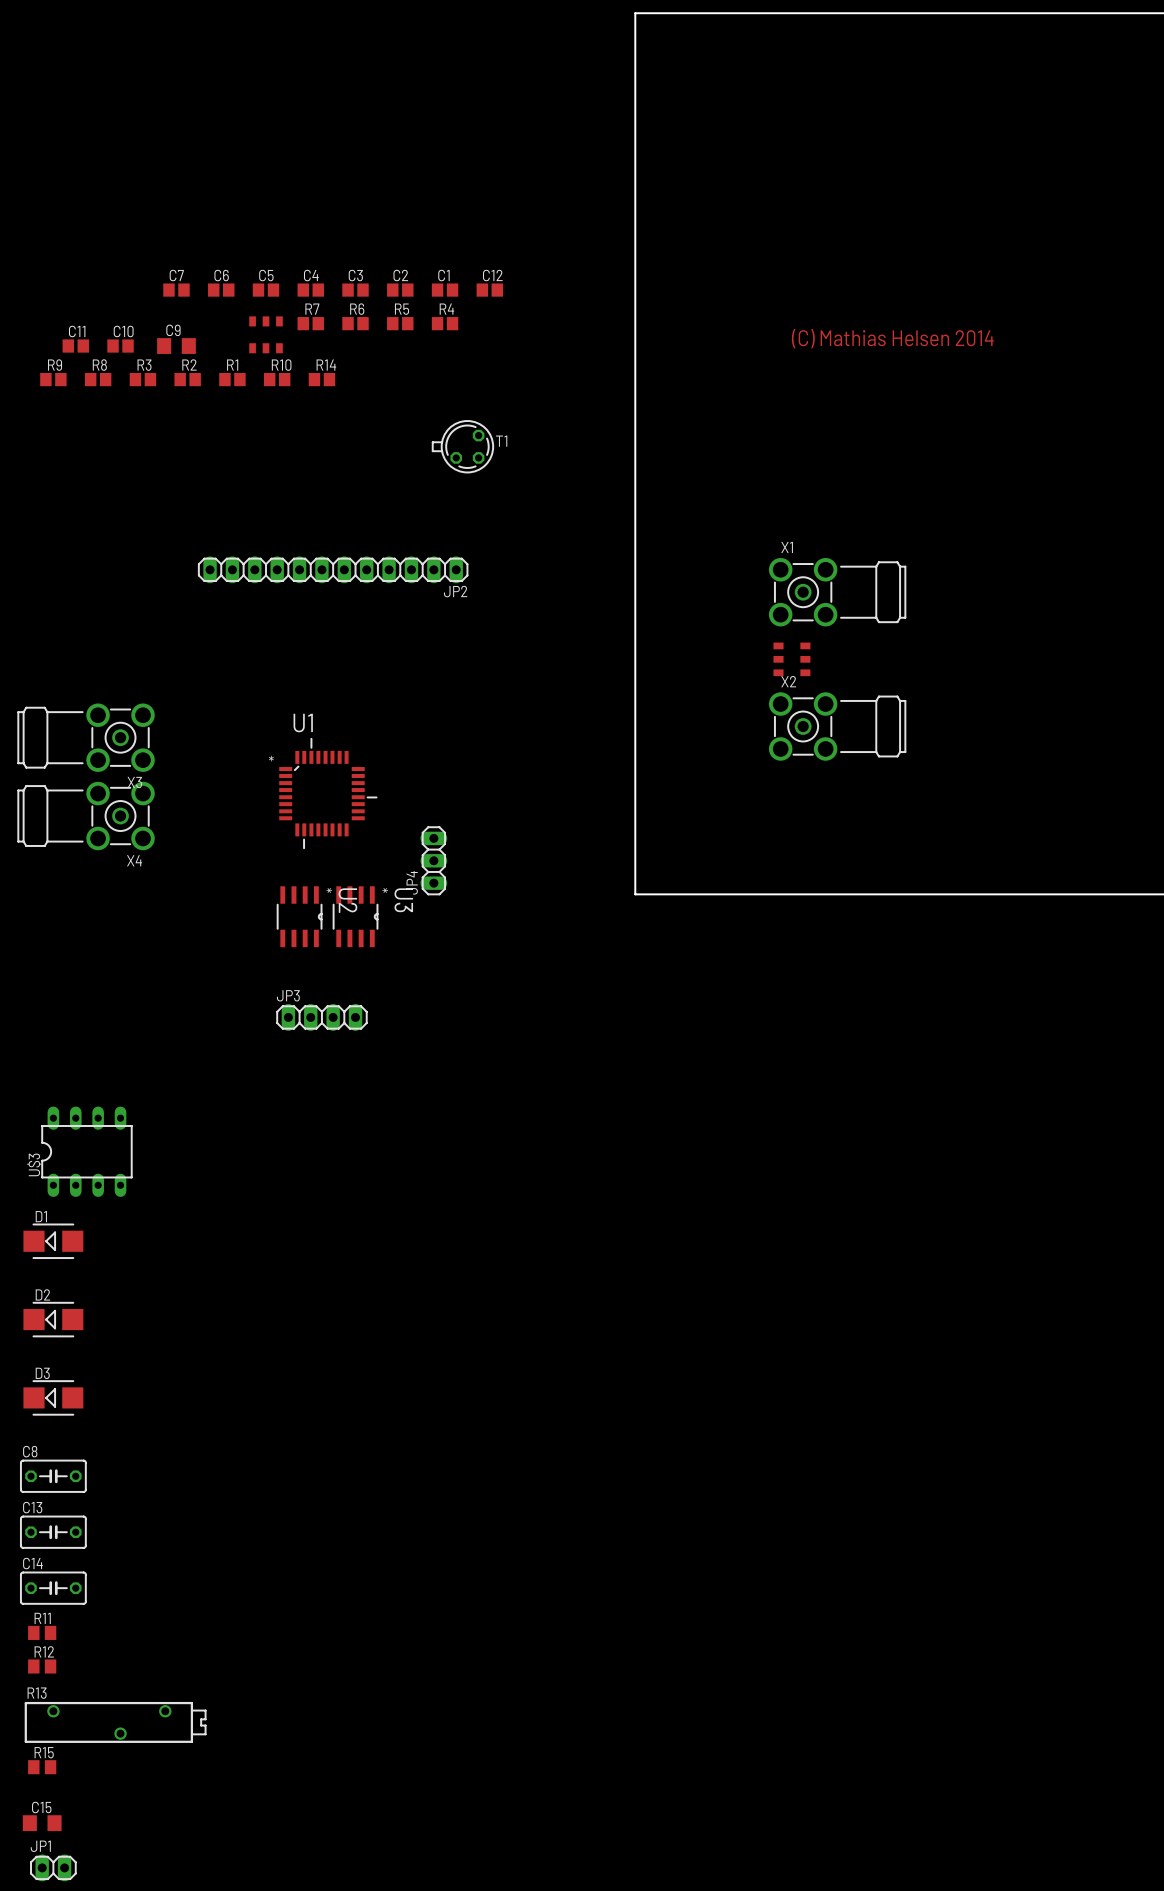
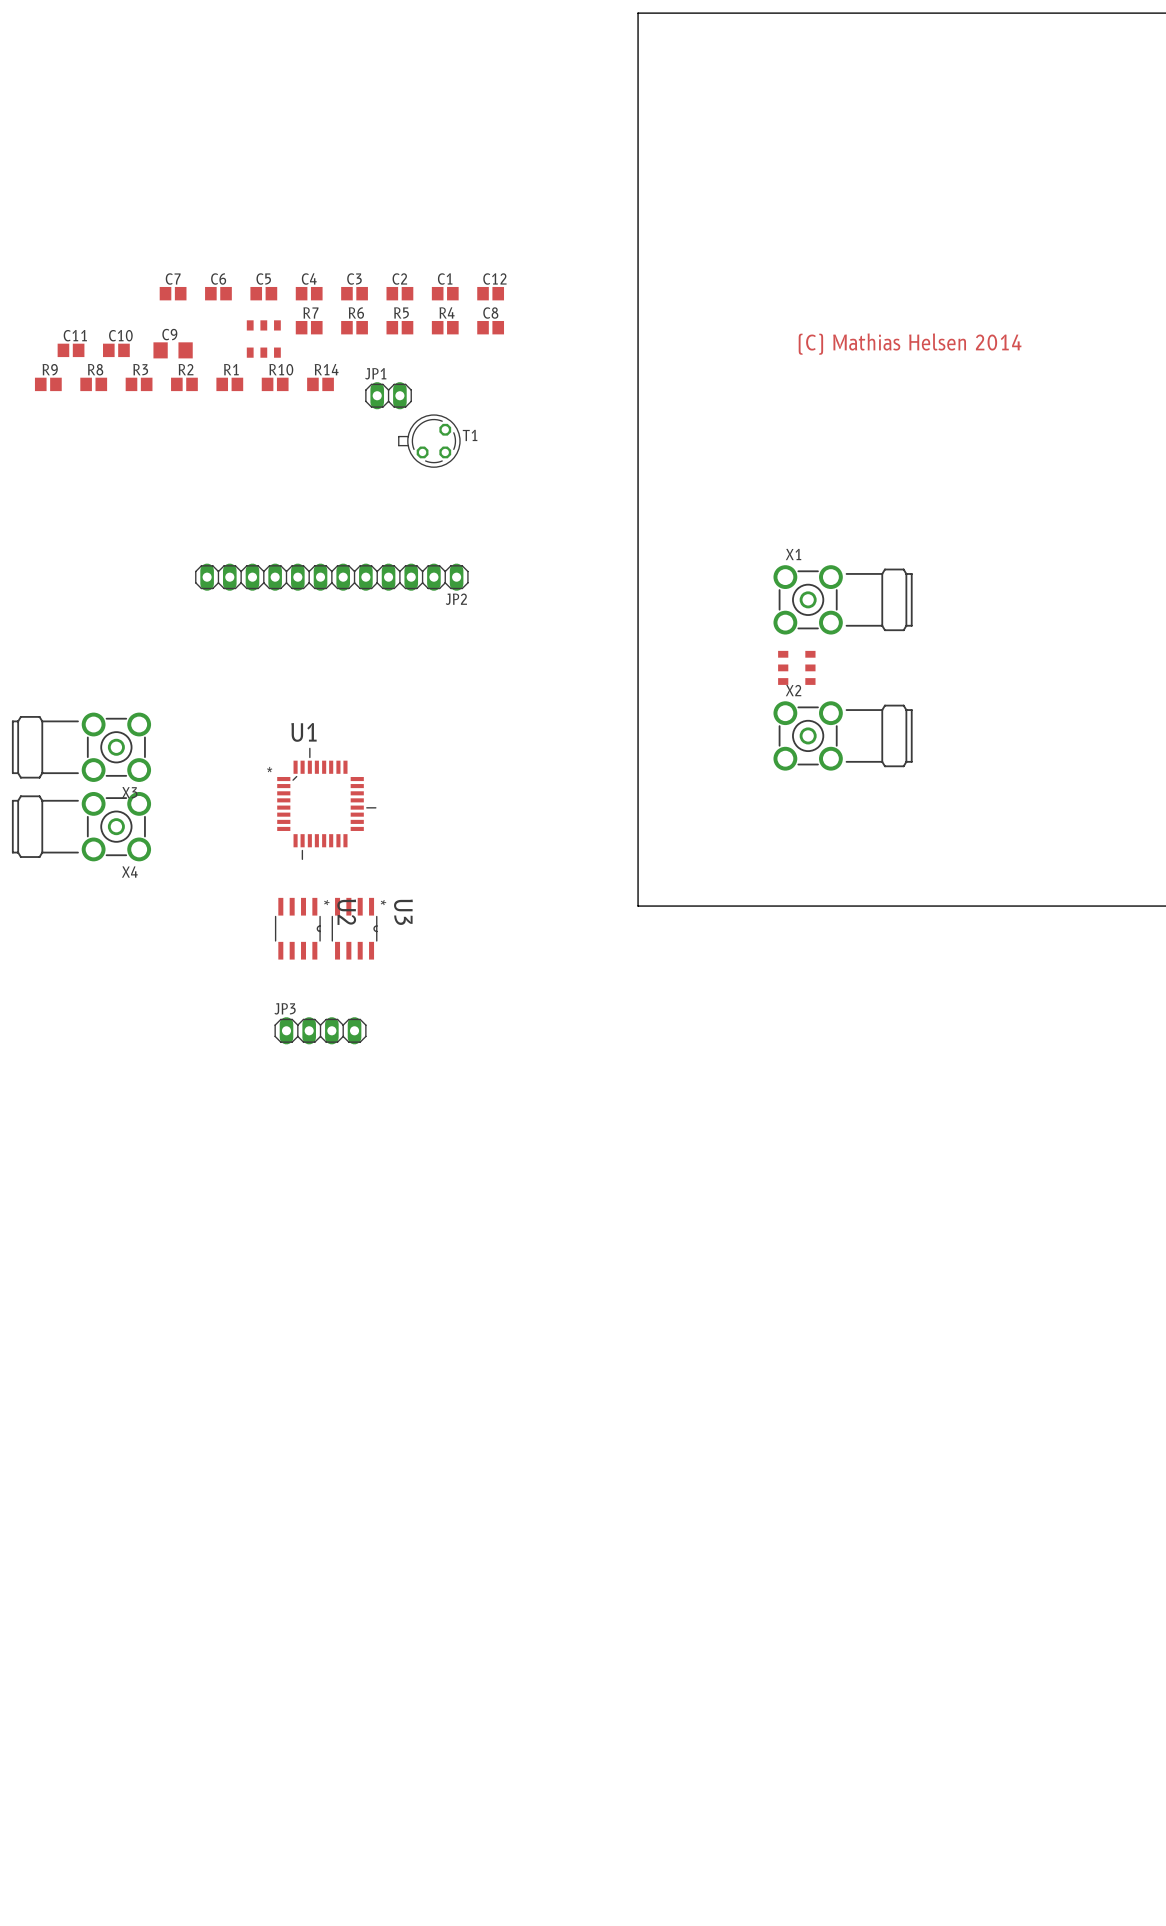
T1 position: (462, 446) -> (429, 441)
JP4: (433, 860) -> none
U$3: (86, 1151) -> none
D1: (53, 1241) -> none
D2: (53, 1319) -> none
D3: (53, 1397) -> none
C8 name position: C8 (30, 1451) -> C8 (490, 313)
C8 footprint: [20, 1459, 87, 1493] -> [477, 320, 505, 335]
C13: (53, 1532) -> none
C14: (53, 1588) -> none
R11: (42, 1632) -> none
R12: (42, 1666) -> none
R13: (115, 1722) -> none
R15: (42, 1767) -> none
C15: (42, 1823) -> none
JP1 position: (53, 1867) -> (388, 395)

